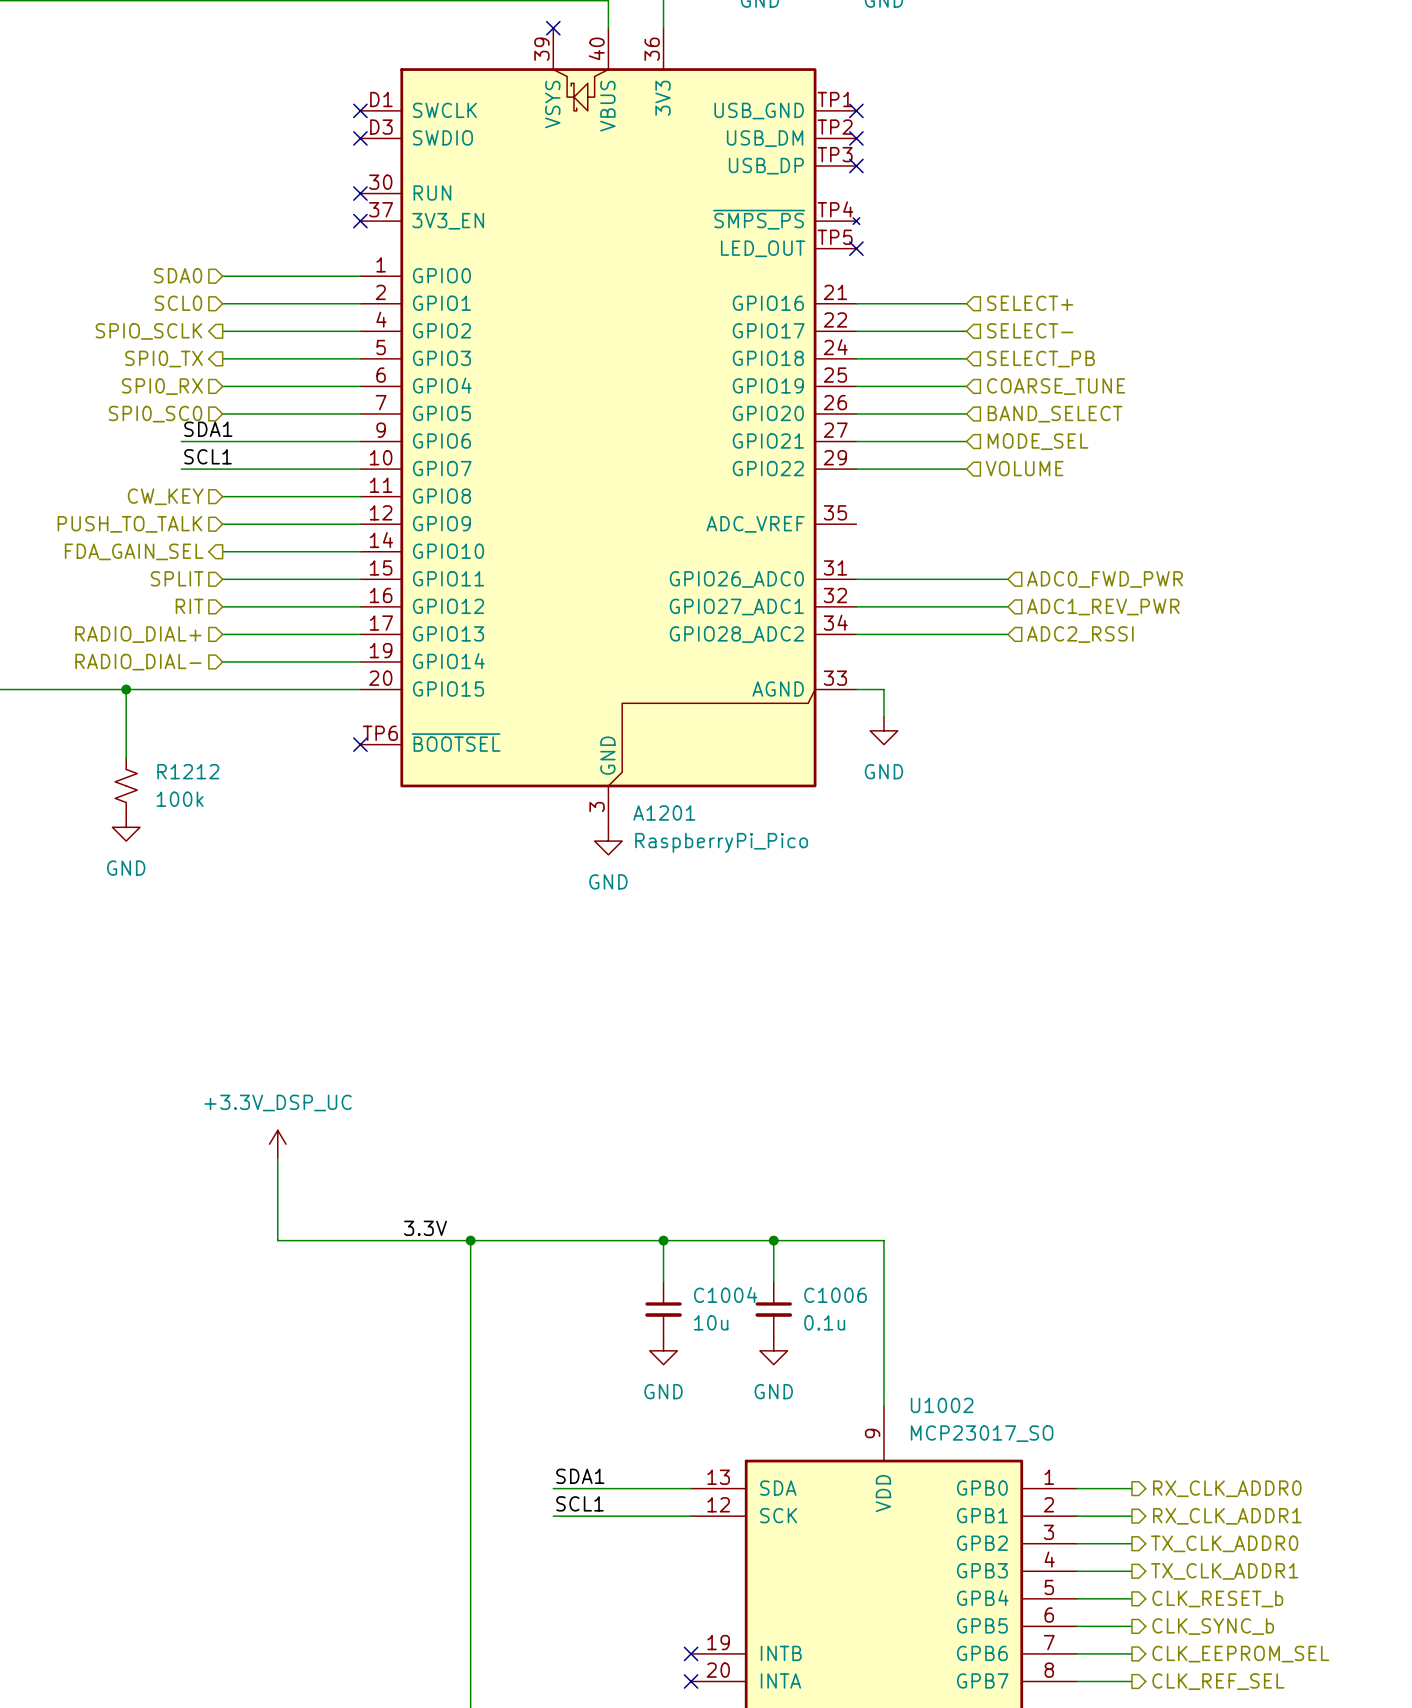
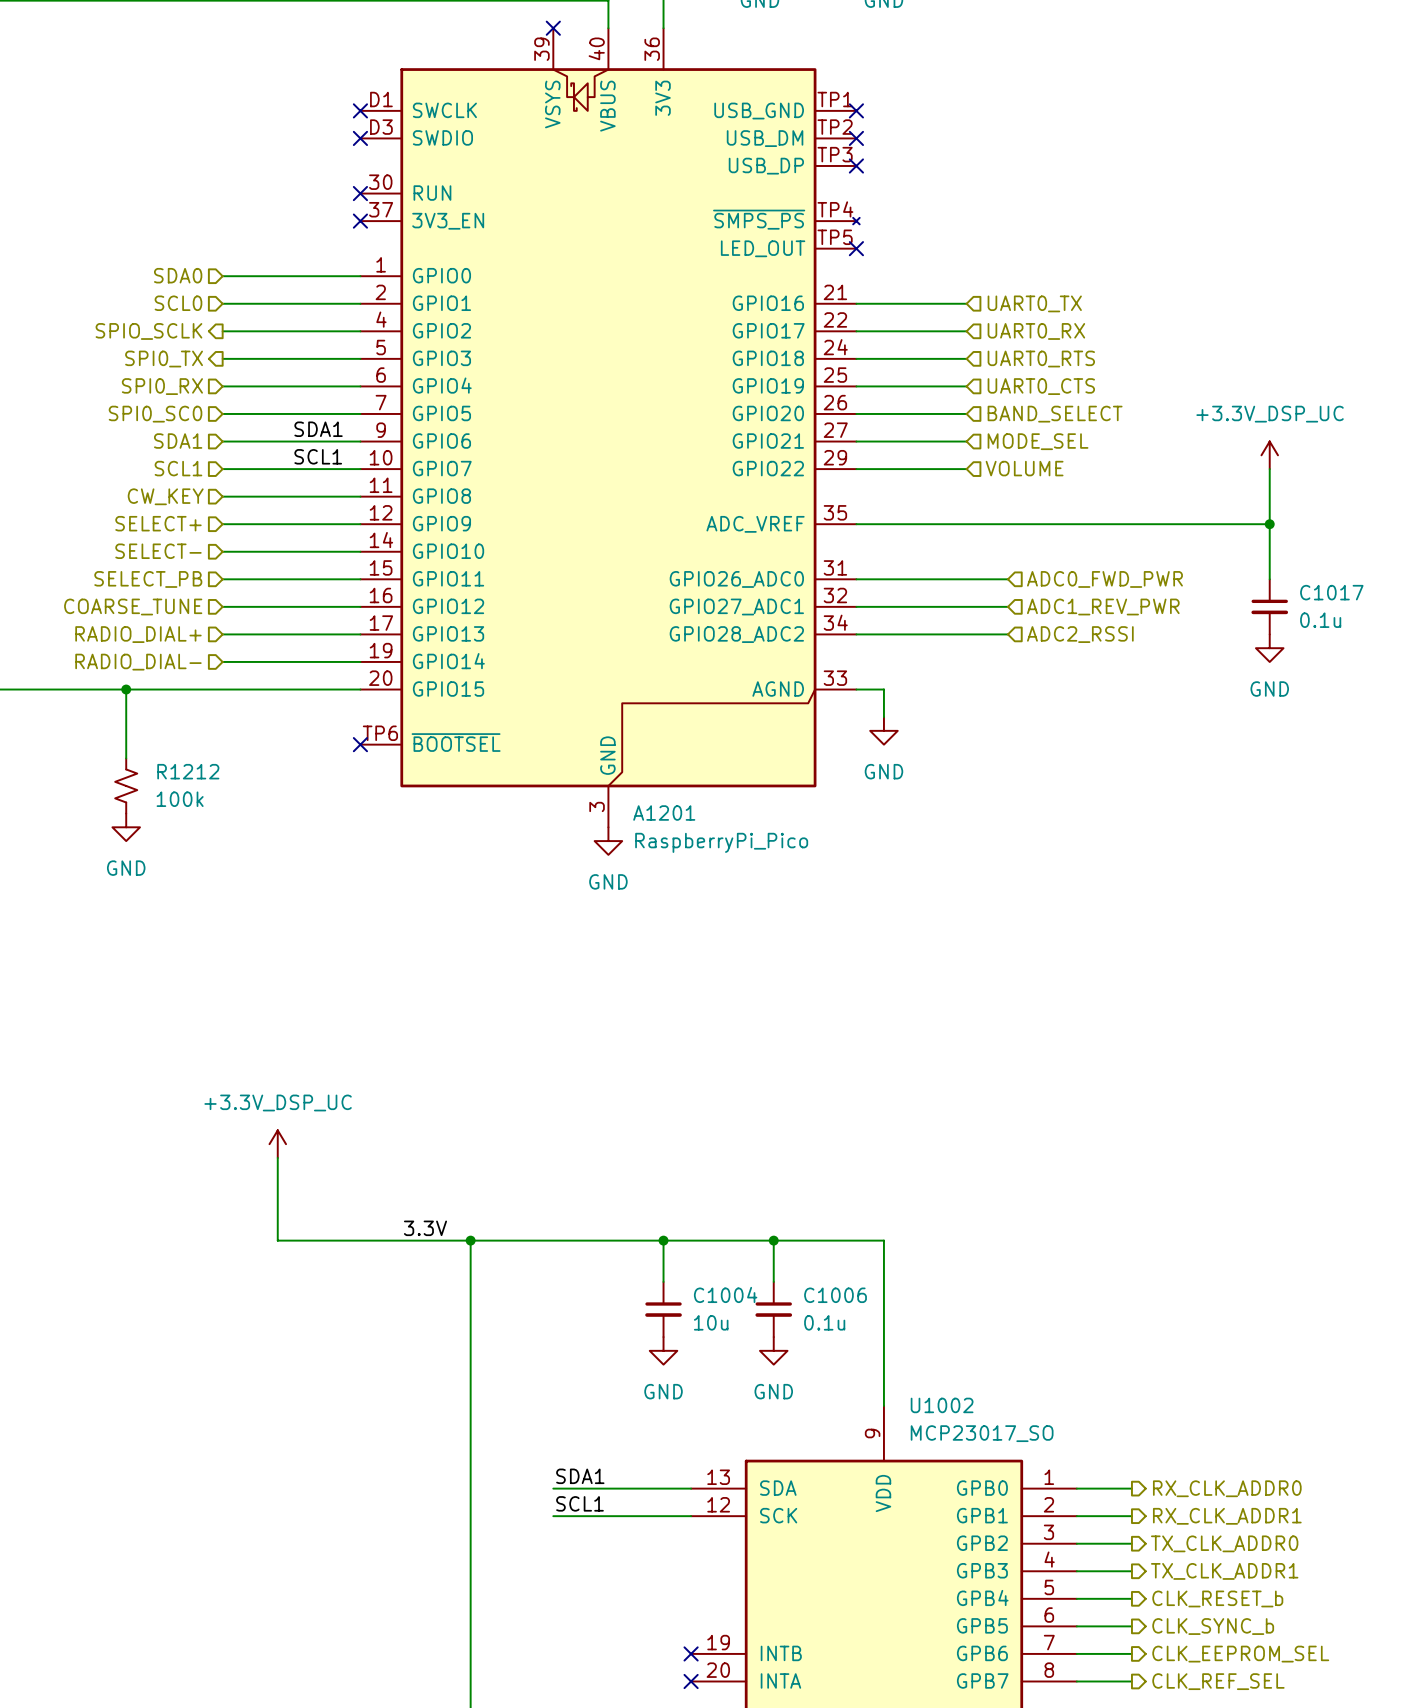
hierarchical label: SELECT+ (1030, 303) -> UART0_TX (1034, 303)
hierarchical label: SELECT- (1030, 330) -> UART0_RX (1036, 331)
hierarchical label: SELECT_PB (1040, 359) -> UART0_RTS (1041, 359)
hierarchical label: COARSE_TUNE (1056, 386) -> UART0_CTS (1041, 386)
label position: SDA1 (208, 429) -> SDA1 (318, 429)
hierarchical label: none -> SDA1 (178, 441)
wire: (181, 441) (222, 441) -> none
power symbol: none -> +3.3V_DSP_UC (1269, 455)
label position: SCL1 (208, 456) -> SCL1 (318, 456)
hierarchical label: none -> SCL1 (178, 468)
wire: (181, 469) (222, 469) -> none
wire: none -> (1269, 469) (1269, 579)
hierarchical label: PUSH_TO_TALK (129, 524) -> SELECT+ (158, 523)
wire: none -> (856, 524) (1269, 524)
junction: none -> (1269, 524)
hierarchical label shape: output (134, 551) -> input (158, 551)
hierarchical label: FDA_GAIN_SEL (134, 551) -> SELECT- (158, 551)
hierarchical label: SPLIT (177, 578) -> SELECT_PB (148, 579)
hierarchical label: RIT (189, 606) -> COARSE_TUNE (133, 607)
C1017: none -> 0.1u (1269, 606)
power symbol: none -> GND (1269, 648)

